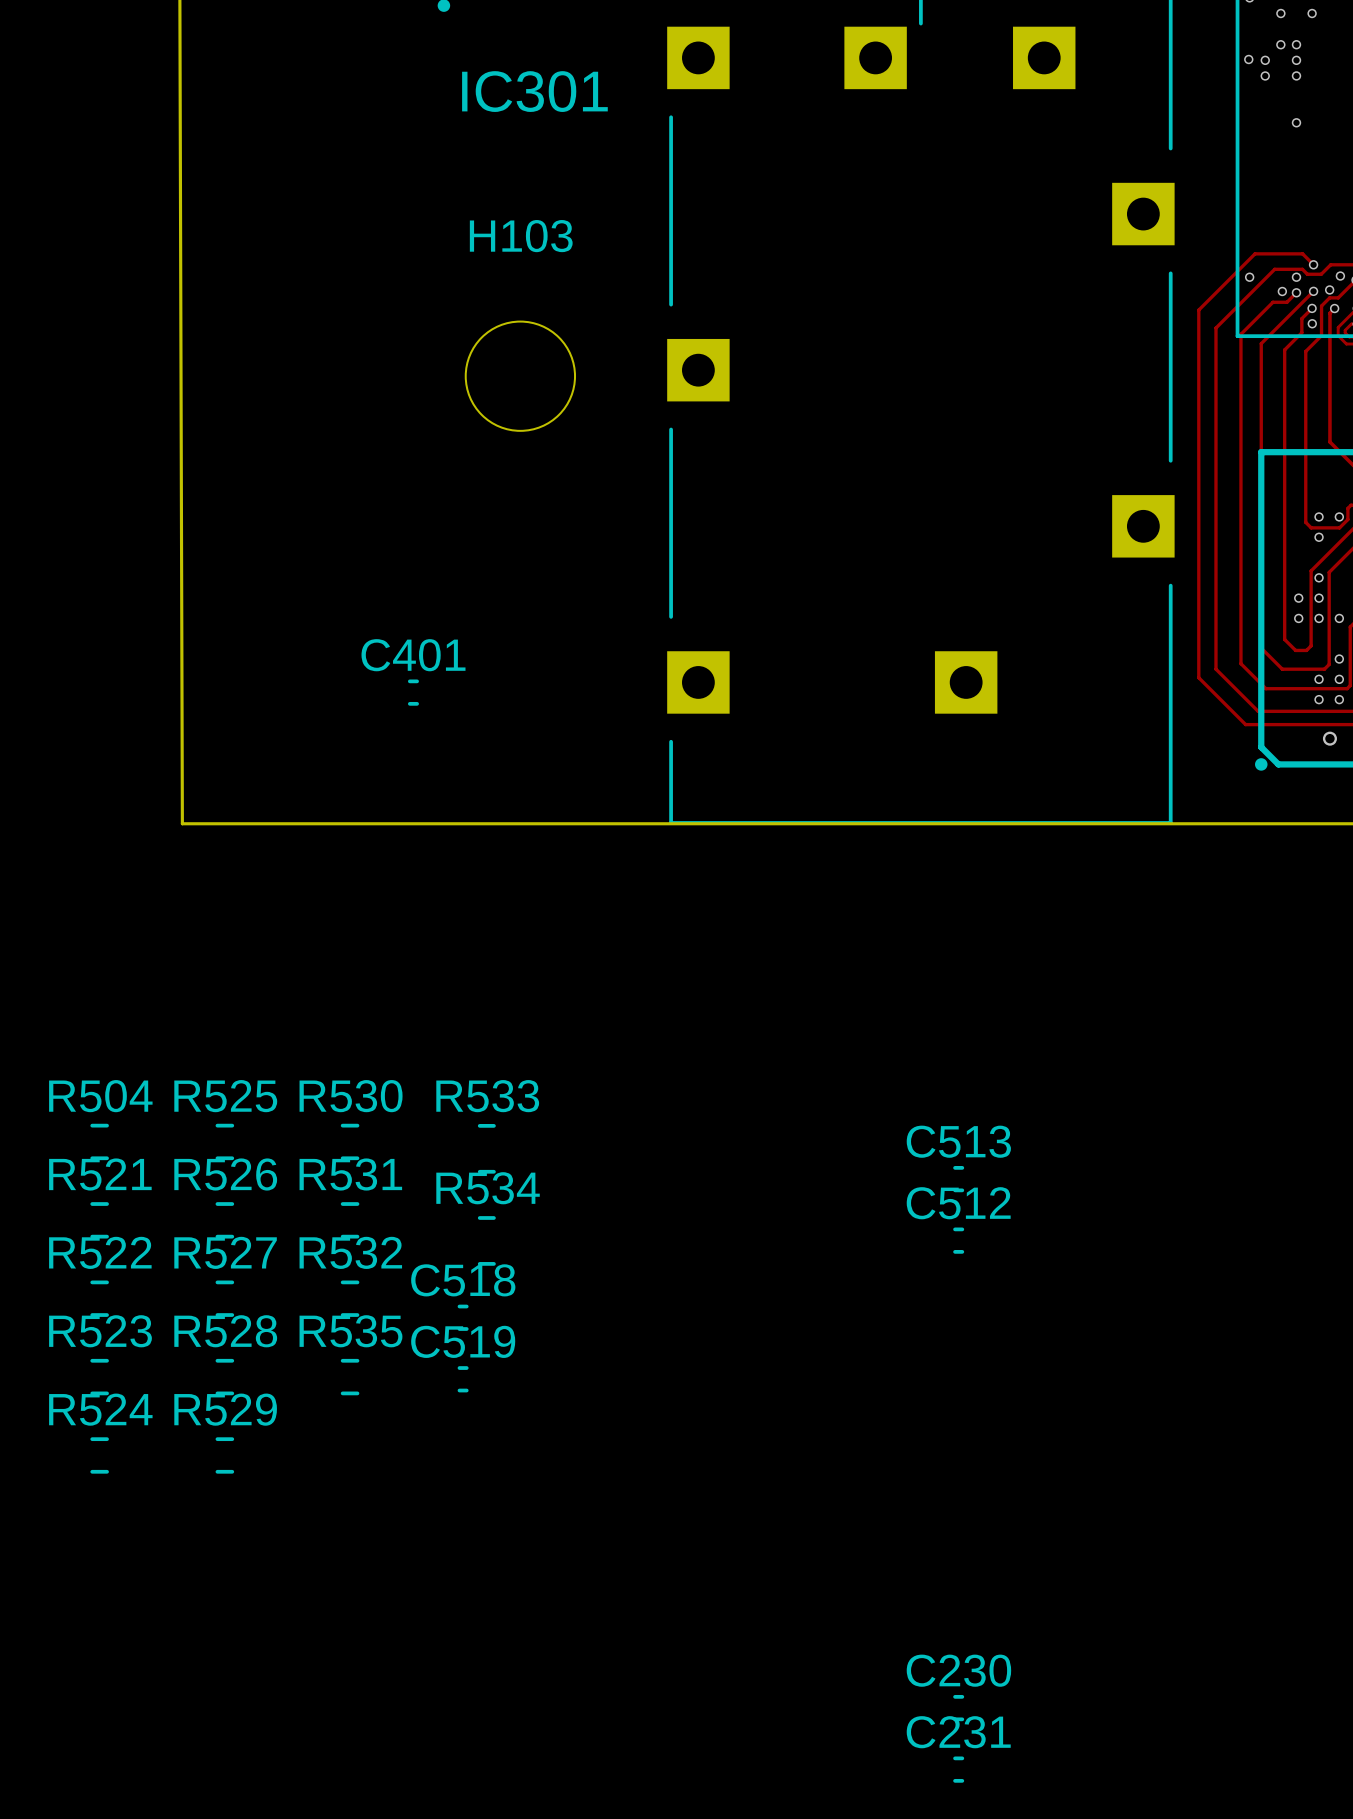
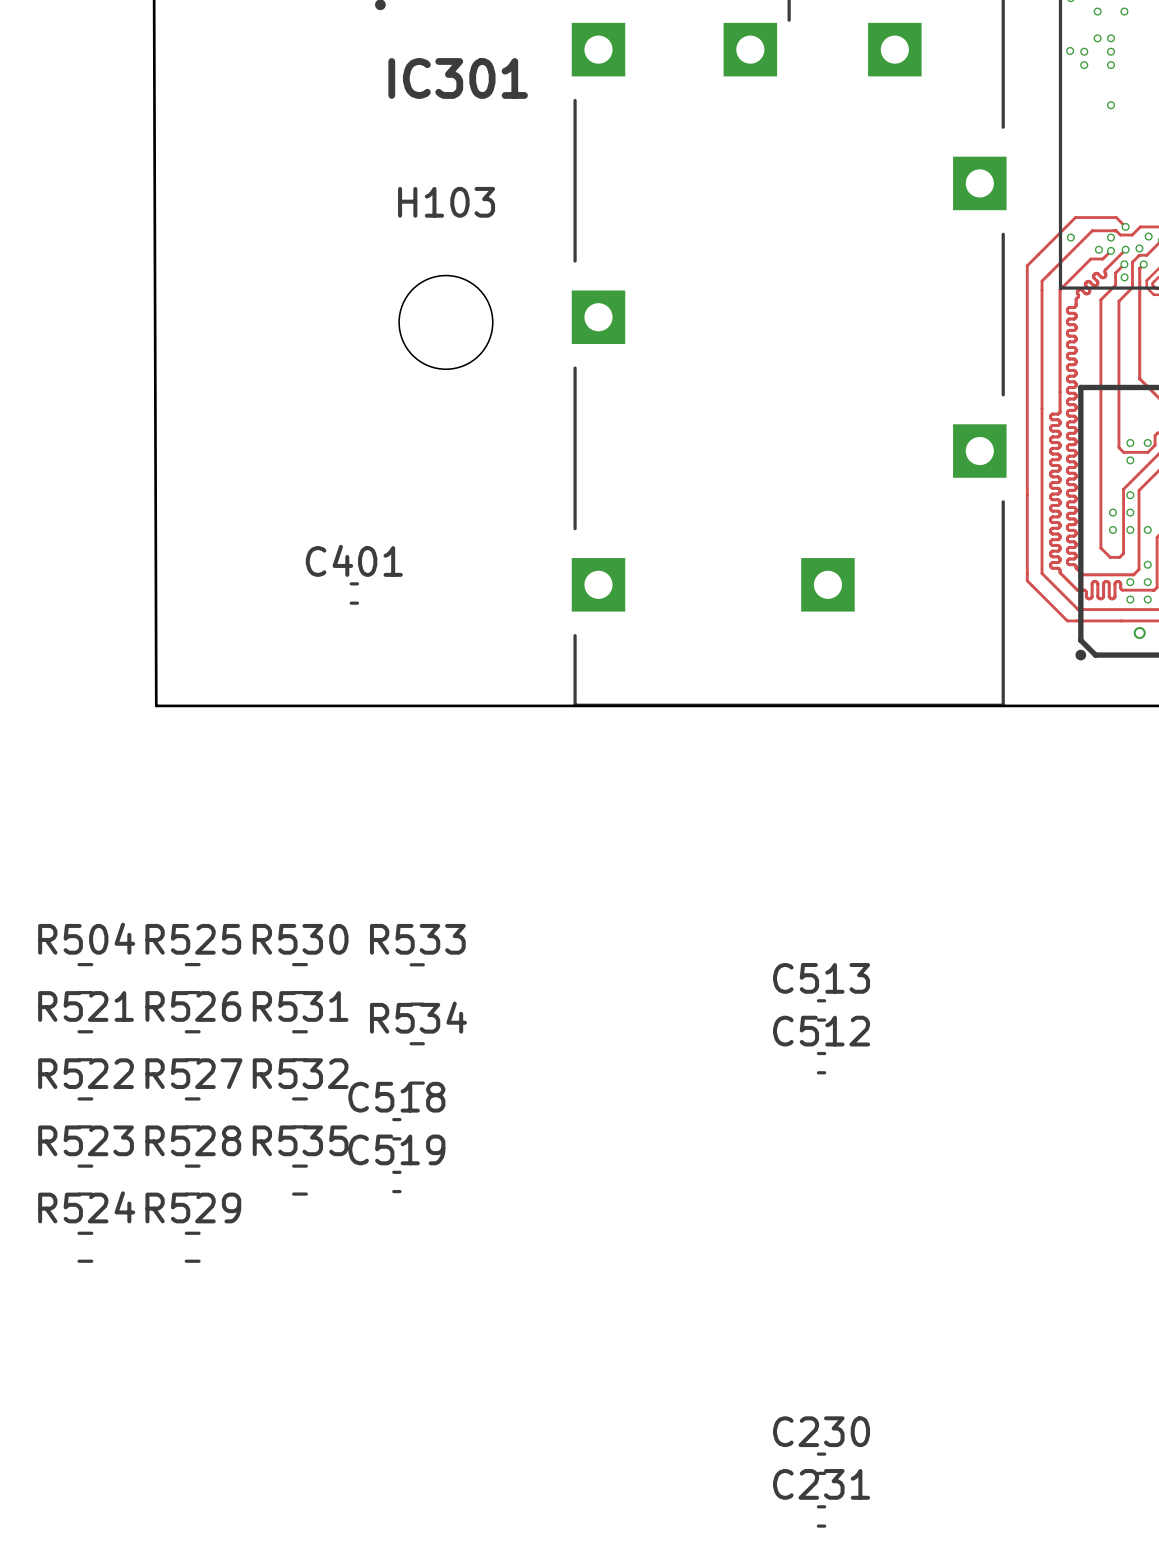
track: (1290, 314) (1261, 343) (1261, 648) (1282, 669) (1324, 669) -> (1106, 269) (1103, 277) (1097, 273) (1093, 275) (1097, 282) (1096, 285) (1088, 281) (1085, 283) (1089, 290) (1088, 293) (1080, 289) (1077, 290) (1075, 306) (1067, 309) (1068, 312) (1074, 313) (1076, 315) (1075, 318) (1067, 320) (1068, 324) (1074, 324) (1076, 327) (1075, 330) (1067, 331) (1068, 335) (1074, 336) (1076, 339) (1074, 341) (1068, 342) (1067, 345) (1075, 347) (1076, 350) (1074, 353) (1068, 353) (1067, 356) (1075, 359) (1076, 362) (1074, 364) (1068, 365) (1067, 368) (1075, 370) (1076, 373) (1074, 376) (1068, 376) (1067, 379) (1075, 382) (1076, 385) (1074, 387) (1068, 387) (1067, 391) (1075, 393) (1076, 396) (1074, 398) (1068, 399) (1067, 402) (1075, 405) (1076, 408) (1074, 410) (1068, 410) (1067, 414) (1075, 416) (1076, 419) (1074, 421) (1068, 422) (1067, 425) (1075, 427) (1076, 430) (1074, 433) (1068, 433) (1067, 436) (1075, 439) (1076, 442) (1074, 444) (1068, 445) (1067, 448) (1075, 450) (1076, 453) (1074, 455) (1068, 456) (1067, 459) (1068, 461) (1075, 462) (1076, 465) (1074, 467) (1068, 467) (1067, 470) (1068, 473) (1075, 473) (1076, 476) (1074, 478) (1068, 479) (1067, 482) (1068, 484) (1075, 485) (1076, 488) (1074, 490) (1068, 490) (1067, 493) (1068, 495) (1075, 496) (1076, 499) (1074, 501) (1068, 502) (1067, 505) (1068, 507) (1075, 507) (1076, 510) (1074, 513) (1068, 513) (1067, 516) (1068, 518) (1075, 519) (1076, 522) (1074, 524) (1068, 525) (1067, 528) (1068, 530) (1075, 530) (1076, 533) (1074, 535) (1068, 536) (1067, 539) (1068, 541) (1075, 542) (1076, 545) (1074, 547) (1068, 547) (1067, 550) (1068, 553) (1075, 553) (1076, 556) (1074, 558) (1068, 559) (1067, 562) (1075, 565) (1082, 574) (1135, 573)
track: (1240, 334) (1240, 663) (1265, 688) (1310, 688) -> (1063, 286) (1060, 289) (1060, 412) (1050, 416) (1051, 419) (1060, 421) (1059, 425) (1052, 425) (1050, 427) (1051, 430) (1059, 432) (1059, 436) (1052, 437) (1050, 439) (1051, 442) (1059, 443) (1059, 447) (1051, 448) (1050, 451) (1052, 453) (1059, 454) (1060, 457) (1051, 460) (1050, 463) (1060, 467) (1059, 470) (1052, 471) (1050, 473) (1051, 476) (1059, 477) (1059, 481) (1051, 482) (1050, 486) (1060, 490) (1059, 493) (1051, 494) (1050, 497) (1060, 501) (1059, 505) (1052, 505) (1050, 507) (1051, 510) (1059, 512) (1059, 516) (1051, 517) (1050, 520) (1052, 522) (1059, 522) (1059, 526) (1051, 528) (1050, 531) (1052, 533) (1059, 534) (1060, 537) (1051, 540) (1050, 543) (1052, 545) (1059, 545) (1060, 549) (1051, 551) (1050, 554) (1052, 556) (1059, 557) (1060, 560) (1058, 562) (1051, 562) (1050, 566) (1059, 568) (1060, 572) (1077, 590) (1085, 590) (1087, 598) (1092, 597) (1092, 583) (1093, 581) (1097, 583) (1099, 598) (1103, 597) (1105, 581) (1109, 583) (1110, 598) (1114, 597) (1116, 581) (1120, 582) (1120, 588) (1122, 590)

